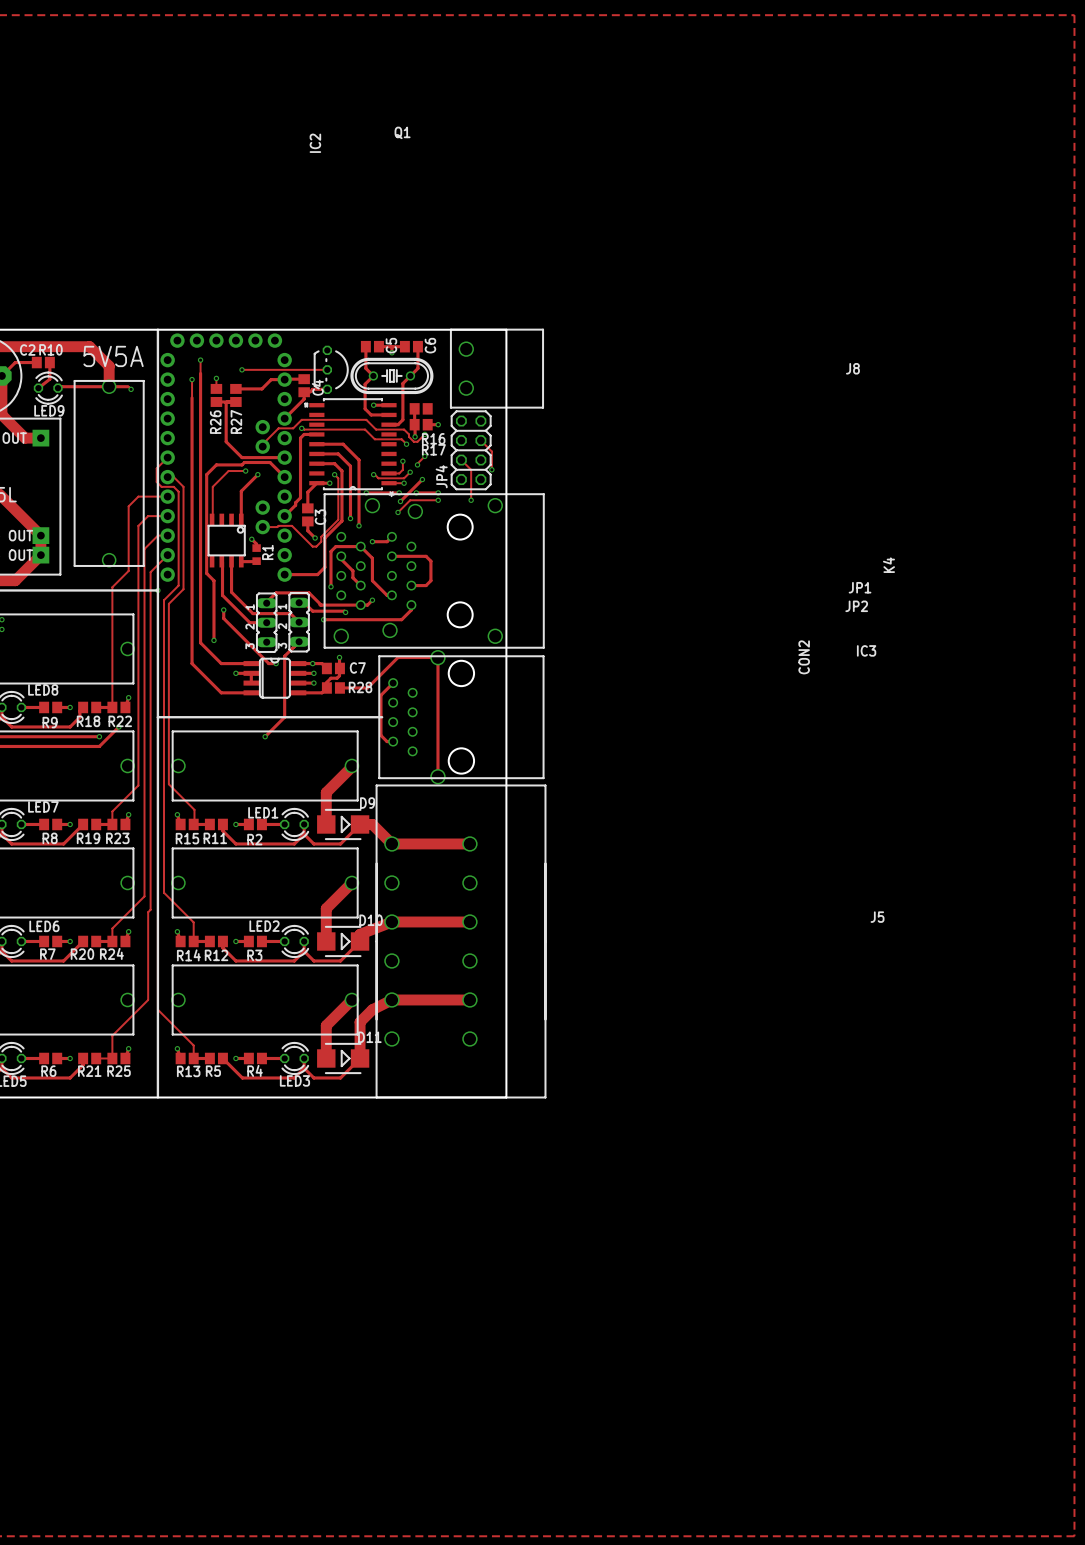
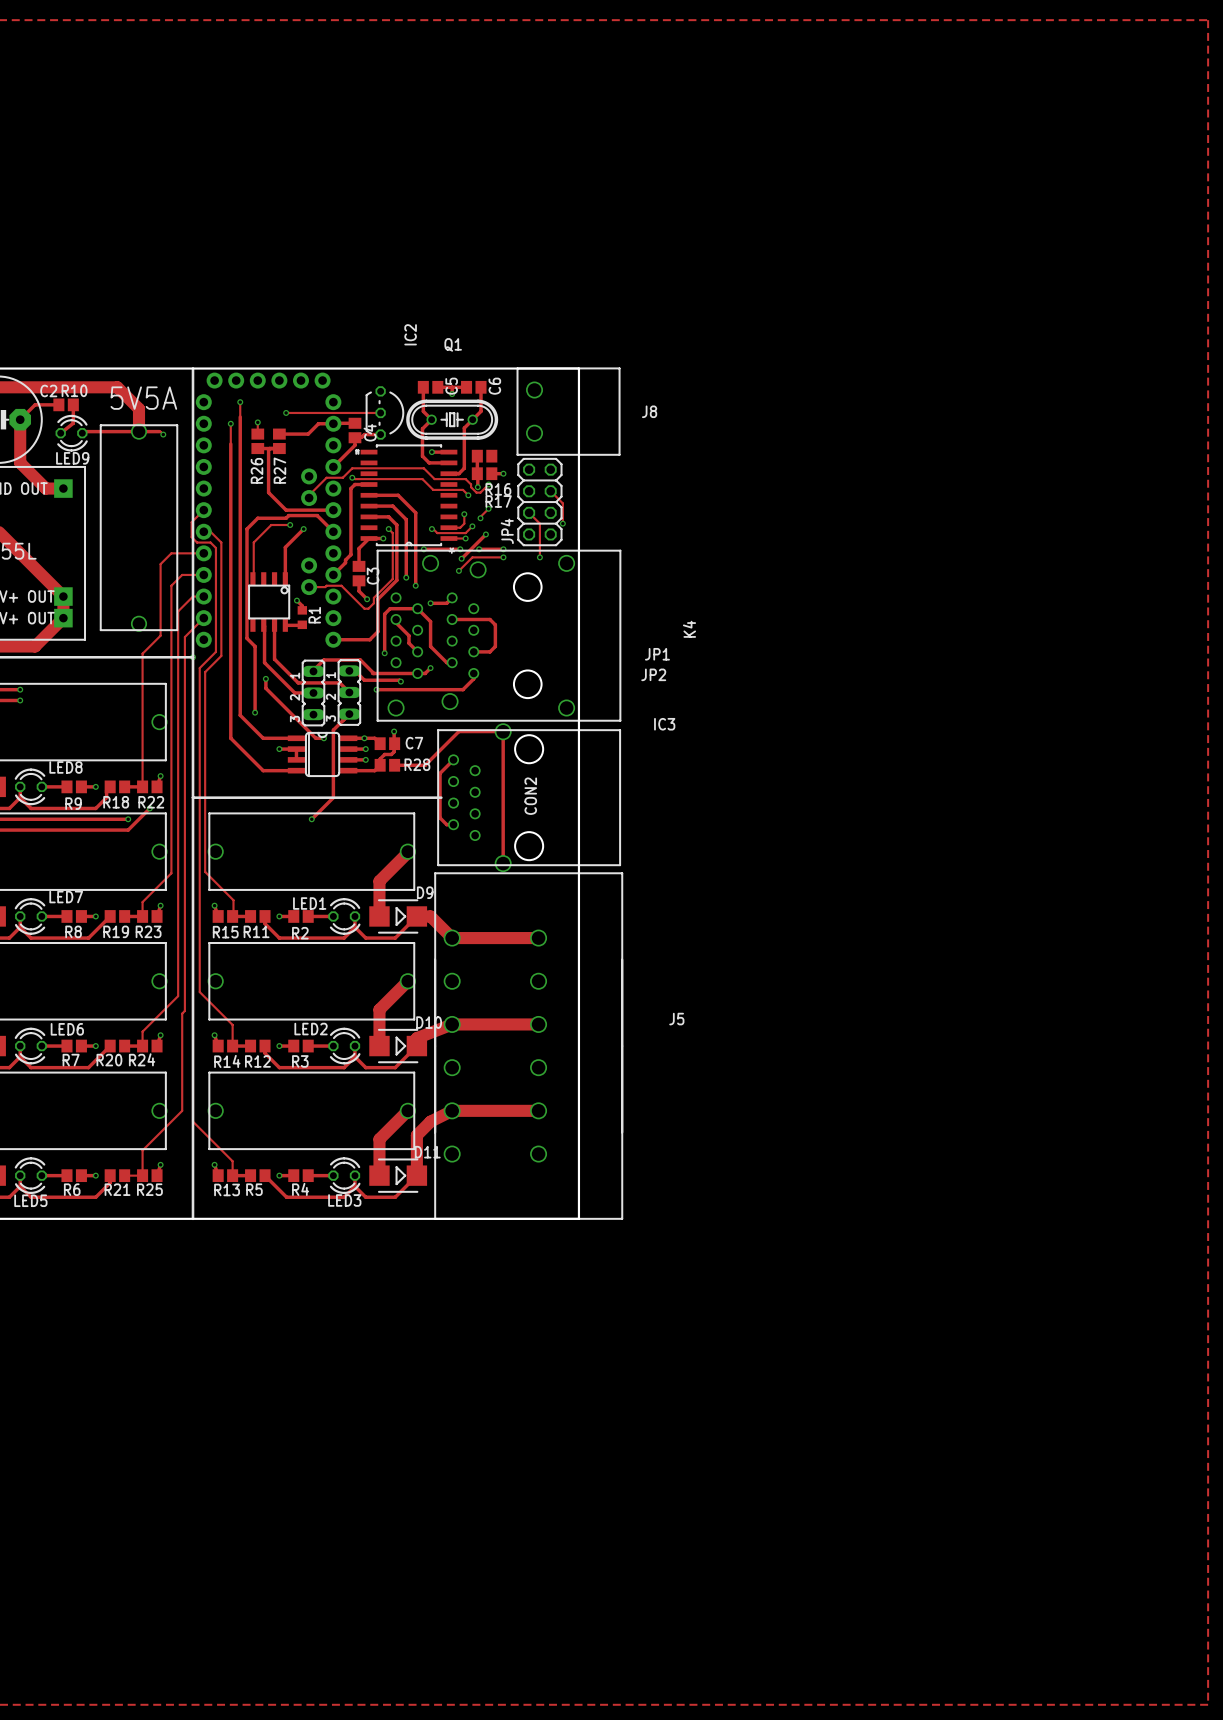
Q1 name position: Q1 (402, 132) -> Q1 (453, 344)
IC2 name position: IC2 (315, 143) -> IC2 (410, 334)
J8 name position: J8 (852, 368) -> J8 (649, 411)
K4 name position: K4 (888, 565) -> K4 (689, 629)
JP1 name position: JP1 (860, 587) -> JP1 (657, 654)
JP2 name position: JP2 (856, 606) -> JP2 (653, 674)
IC3 name position: IC3 (866, 650) -> IC3 (664, 724)
CON2 name position: CON2 (804, 657) -> CON2 (530, 796)
J5 name position: J5 (877, 917) -> J5 (676, 1019)

